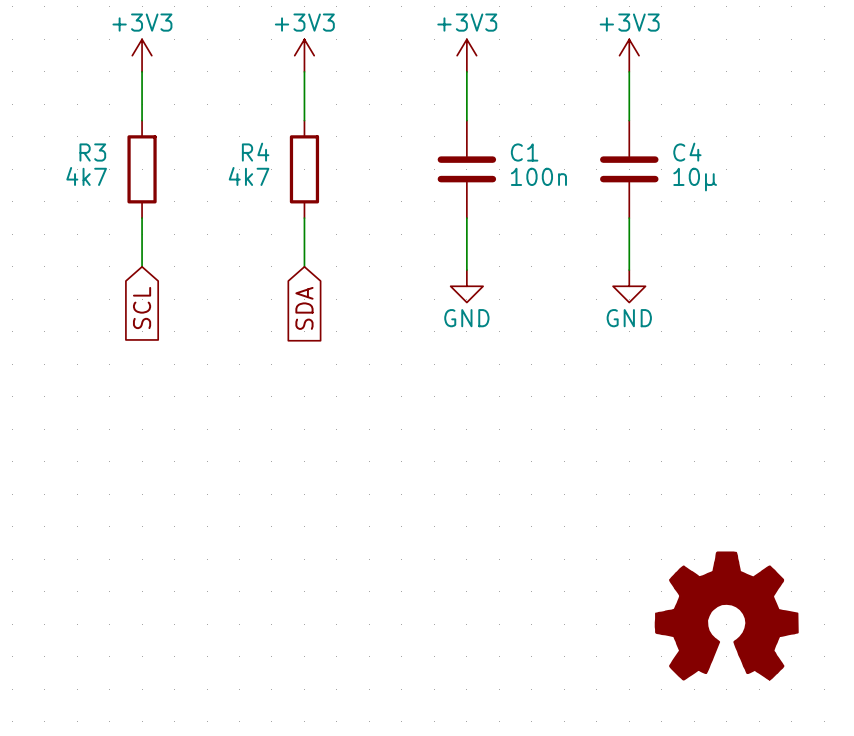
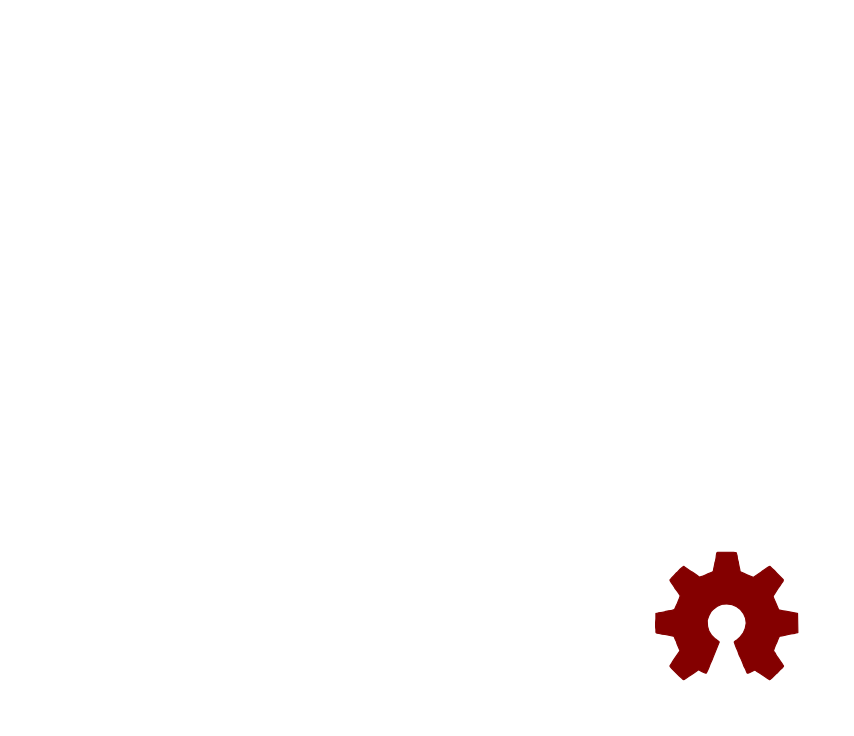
power symbol: +3V3 (142, 55) -> none
power symbol: +3V3 (304, 55) -> none
power symbol: +3V3 (466, 55) -> none
power symbol: +3V3 (629, 55) -> none
wire: (142, 71) (142, 120) -> none
wire: (304, 71) (304, 120) -> none
wire: (466, 71) (466, 120) -> none
wire: (629, 71) (629, 120) -> none
R3: 4k7 (142, 169) -> none
R4: 4k7 (304, 169) -> none
C1: 100n (466, 169) -> none
C4: 10µ (629, 169) -> none
wire: (142, 218) (142, 266) -> none
wire: (304, 218) (304, 266) -> none
wire: (466, 218) (466, 270) -> none
wire: (629, 218) (629, 270) -> none
power symbol: GND (466, 286) -> none
power symbol: GND (629, 286) -> none
global label: SCL (142, 308) -> none
global label: SDA (304, 308) -> none

